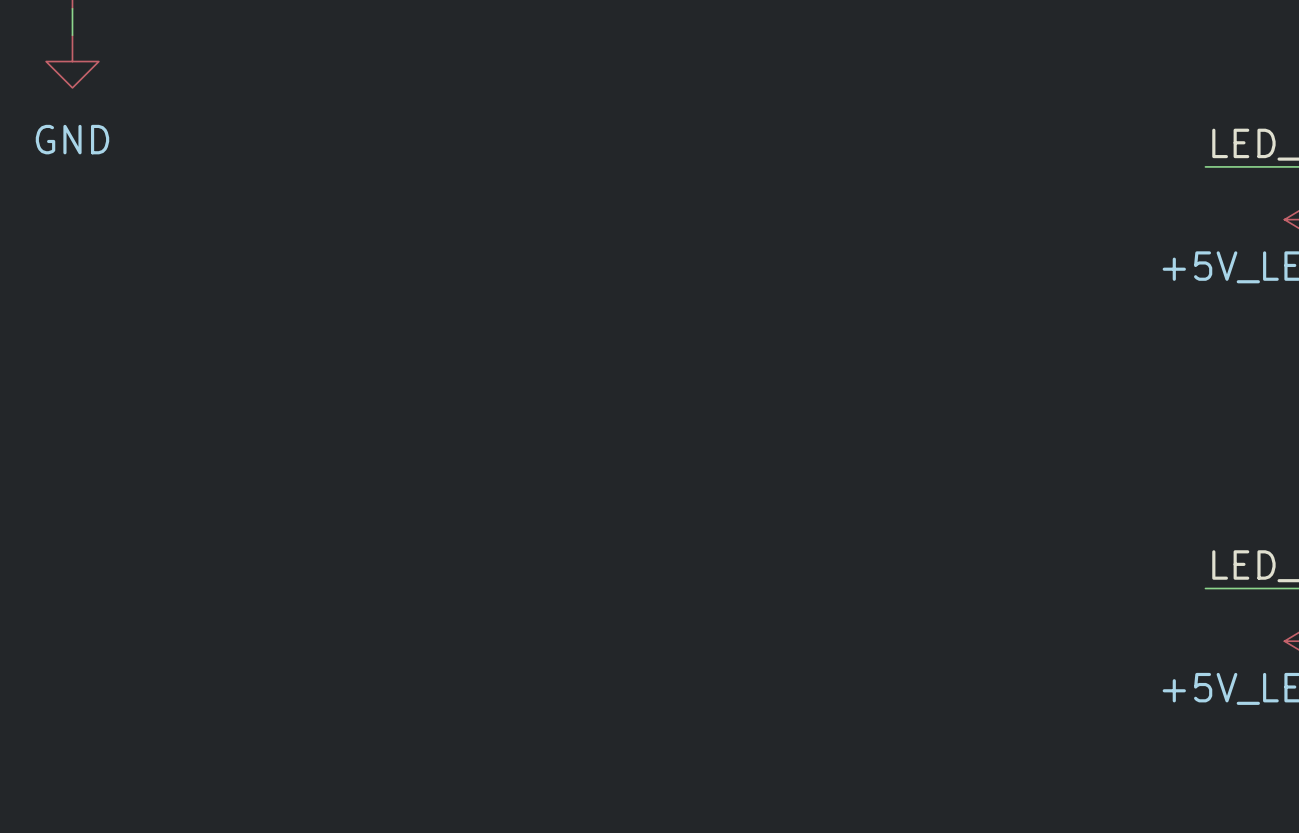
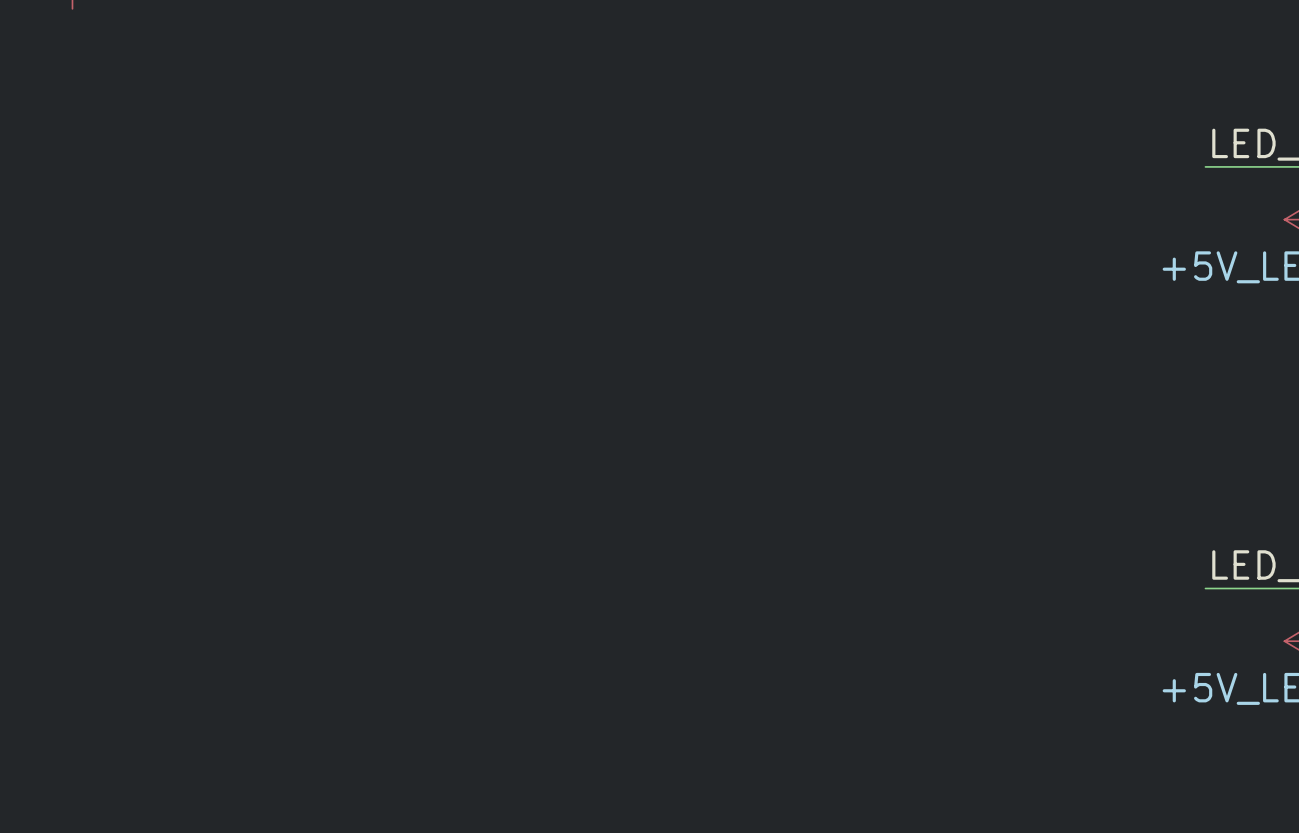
wire: (72, 8) (72, 35) -> none
power symbol: GND (72, 61) -> none

